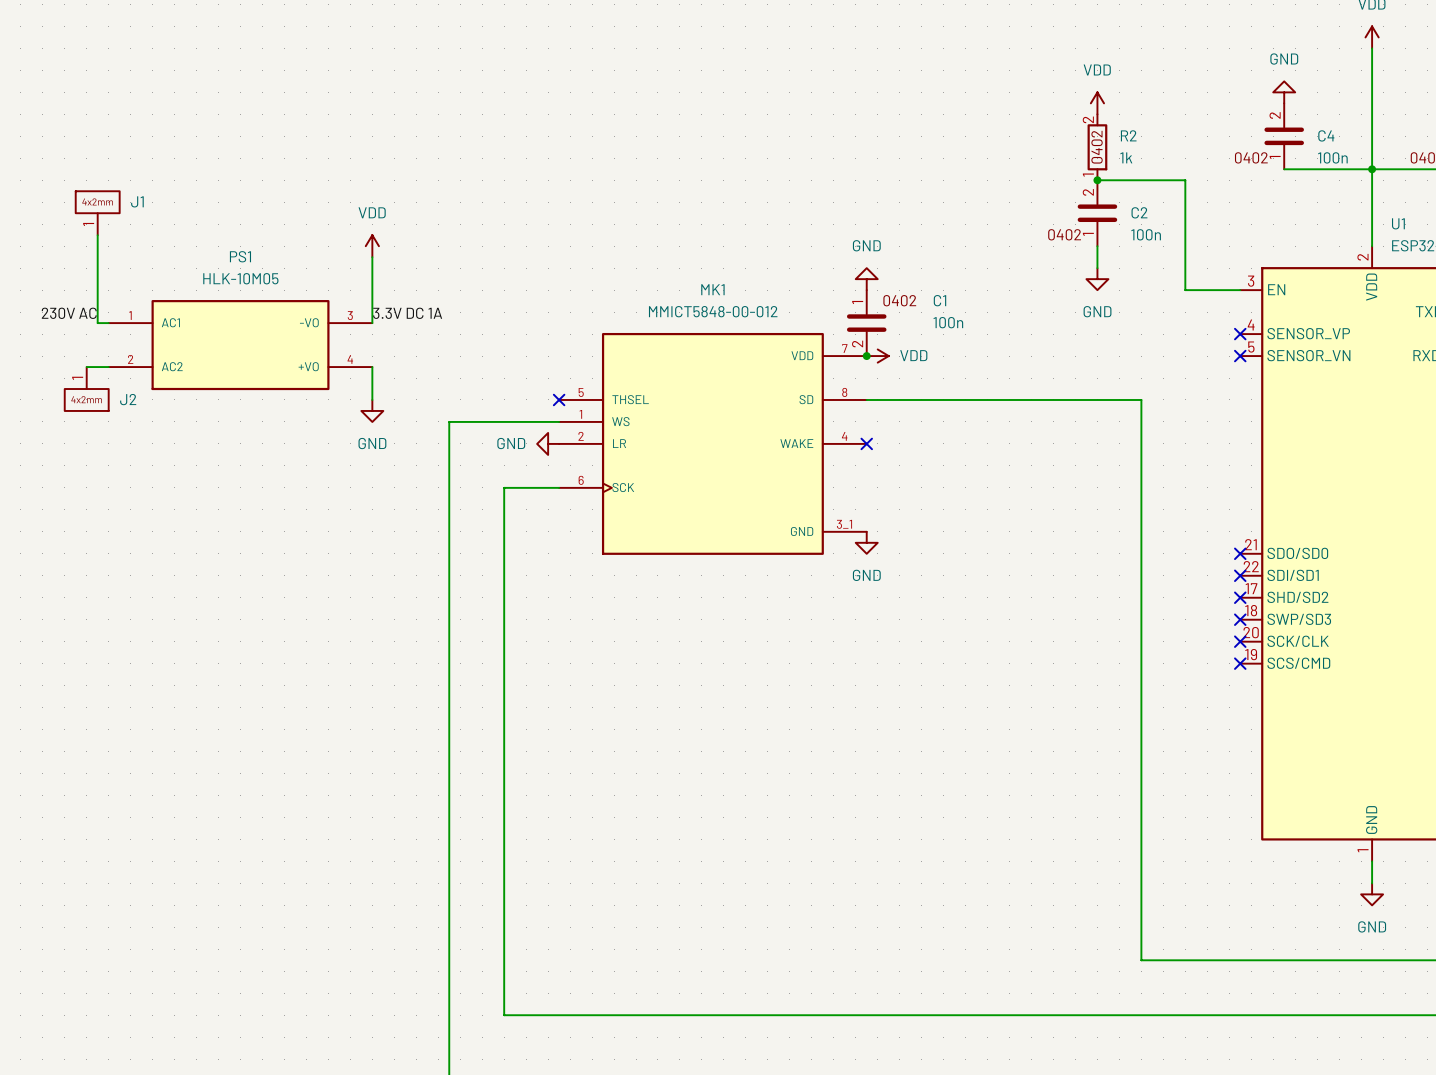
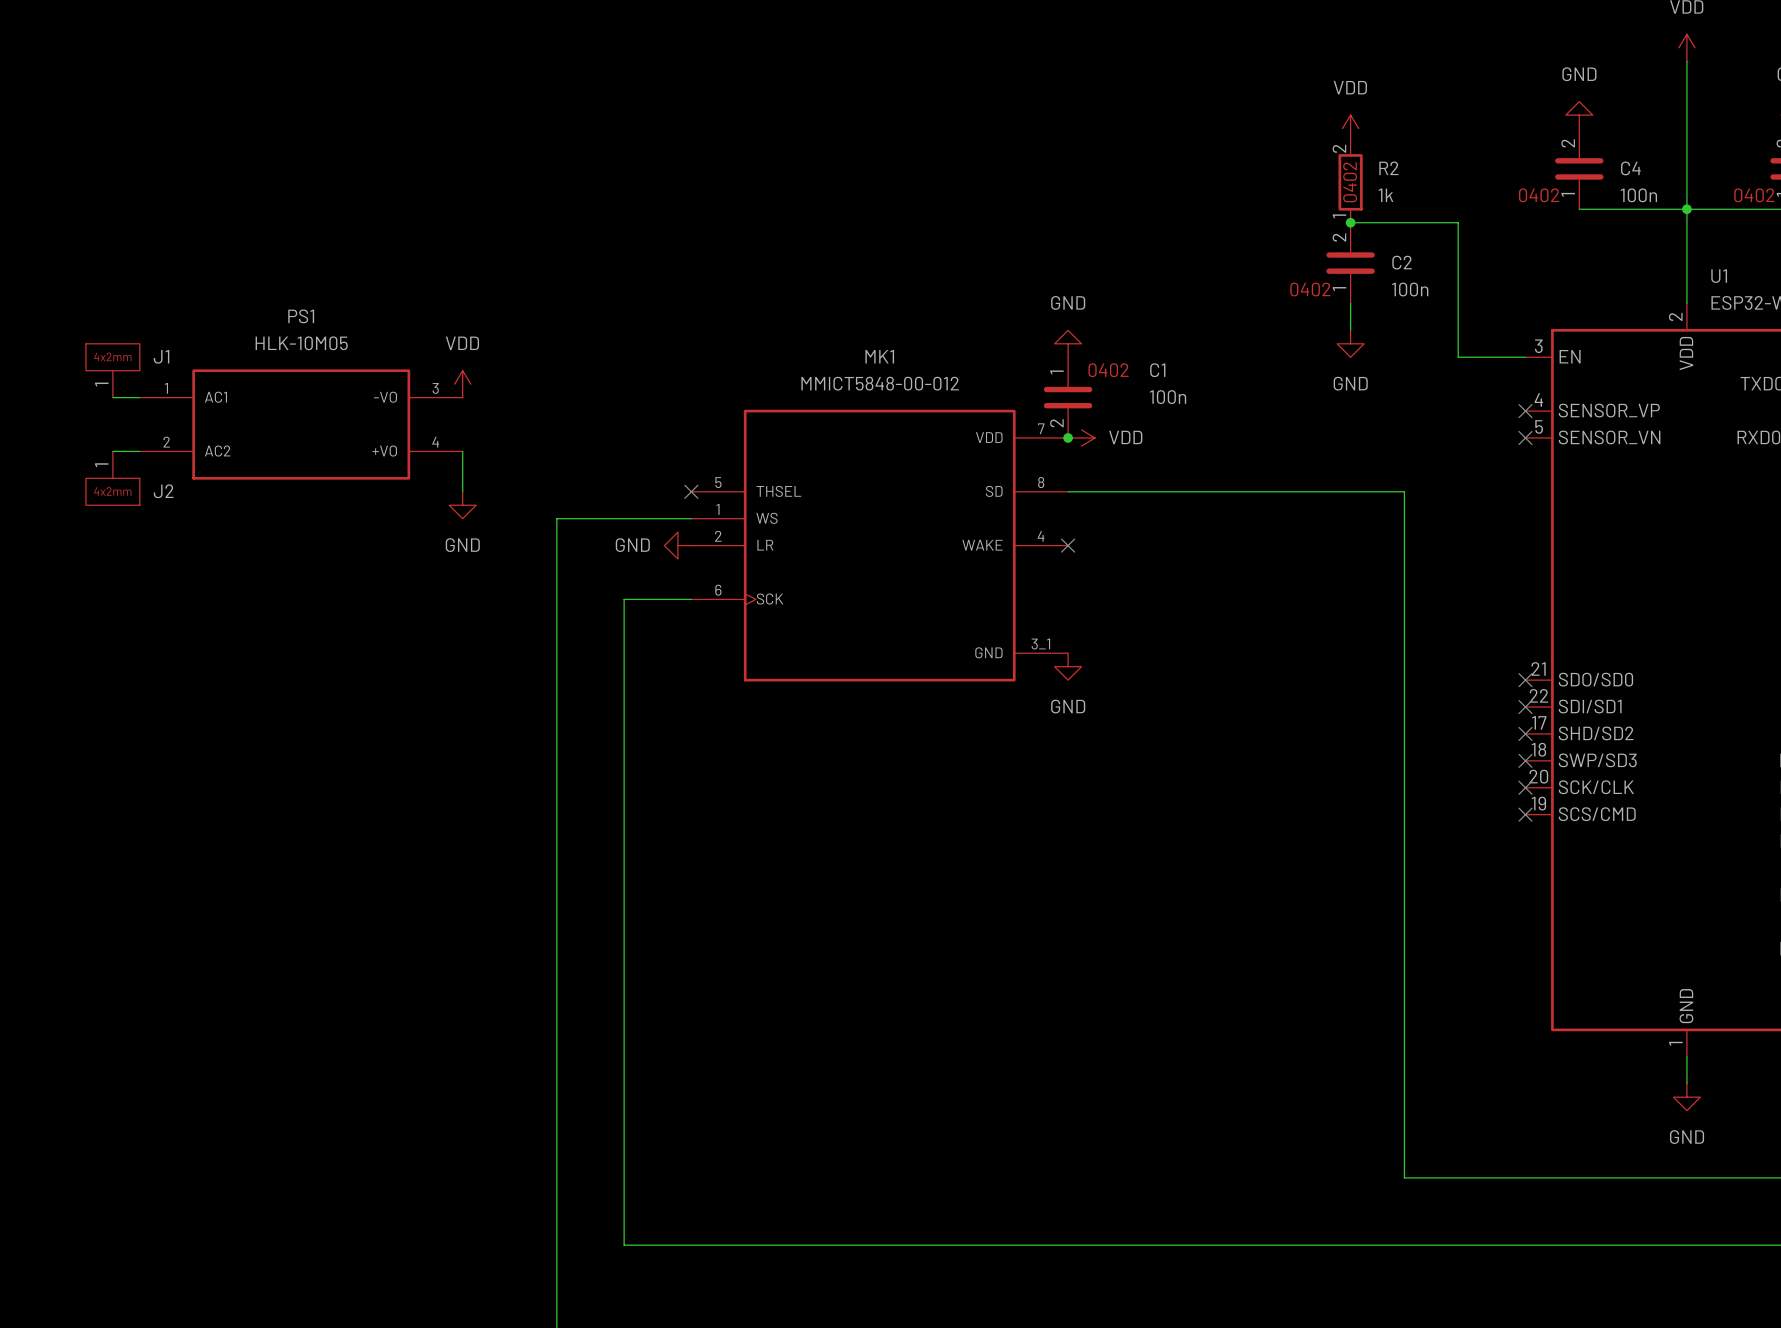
J1 position: (97, 213) -> (112, 370)
wire: (97, 235) (97, 323) -> (112, 397) (126, 397)
power symbol position: VDD (372, 246) -> VDD (462, 384)
wire: (372, 257) (372, 323) -> none
label: 230V AC (69, 313) -> none
label: 3.3V DC 1A (407, 313) -> none

